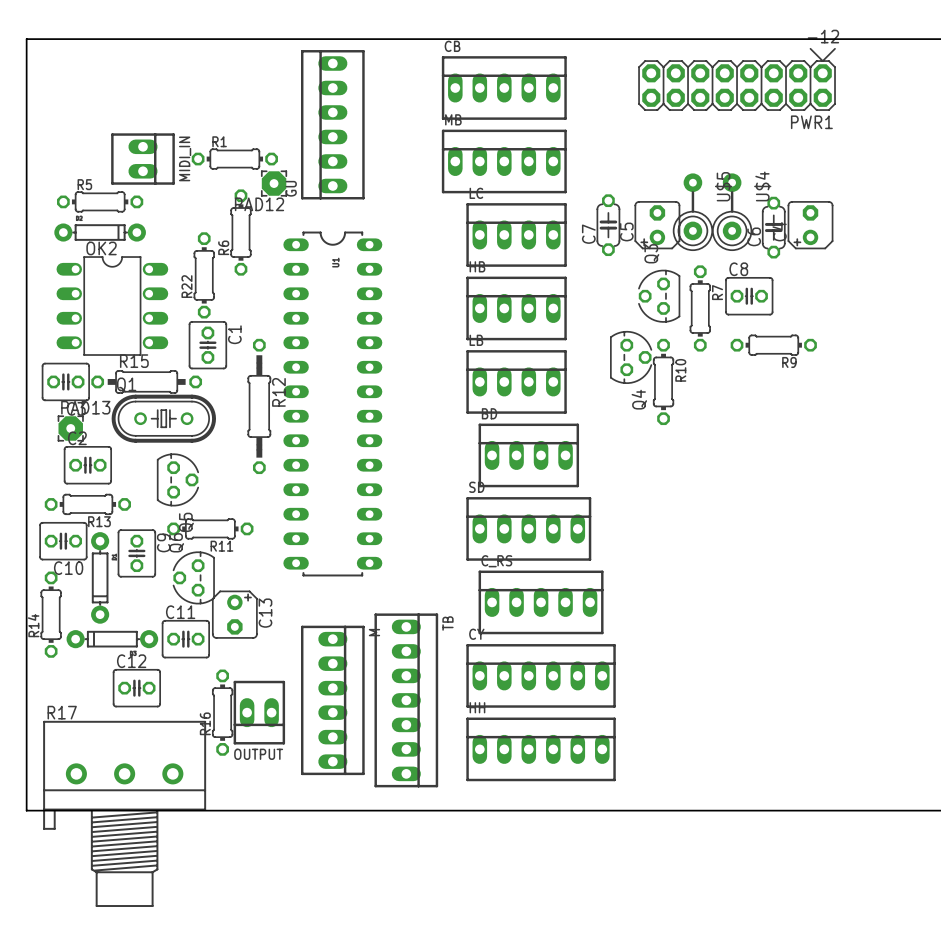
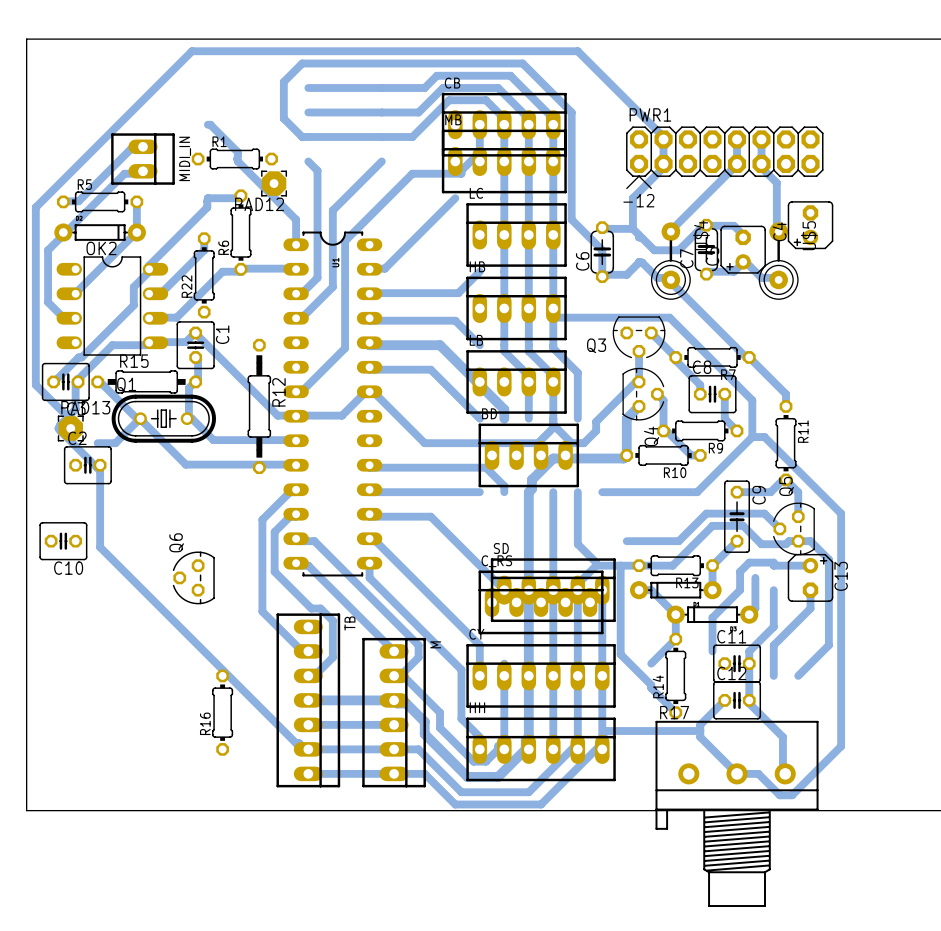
PWR1 footprint: [638, 48, 836, 111] -> [626, 126, 824, 190]
bottom track: none -> (308, 88) (424, 88) (436, 75) (510, 75) (553, 118) (553, 348) (577, 372) (577, 418)
CB position: (504, 88) -> (504, 124)
bottom track: none -> (308, 112) (418, 112) (443, 88) (498, 88) (528, 118) (528, 351) (553, 375) (553, 427) (537, 443) (424, 443) (372, 391) (369, 391) (369, 394) (363, 394) (342, 415) (277, 415) (195, 332) (185, 342) (149, 342) (146, 345) (112, 345) (78, 378) (78, 381) (75, 381) (75, 409) (58, 428) (100, 470) (100, 547) (296, 743) (299, 743) (305, 749) (418, 749) (461, 792) (528, 792) (577, 743) (577, 584) (596, 565)
PWR1 name position: PWR1 (811, 122) -> PWR1 (650, 114)
bottom track: none -> (207, 124) (210, 124) (237, 152) (237, 161) (296, 219) (296, 244)
GU: (332, 124) -> none
bottom track: none -> (479, 124) (479, 152) (461, 170) (461, 173) (412, 173) (345, 241) (345, 348) (302, 391) (296, 391)
bottom track: none -> (737, 139) (737, 164) (670, 231)
bottom track: none -> (761, 139) (761, 167) (776, 182) (776, 228) (778, 231)
bottom track: none -> (143, 146) (143, 149) (130, 149) (78, 201) (63, 201)
bottom track: none -> (308, 161) (317, 170) (317, 277) (302, 293) (296, 293)
bottom track: none -> (381, 161) (332, 210) (332, 287) (302, 317) (296, 318)
bottom track: none -> (143, 171) (143, 173) (124, 173) (66, 231) (63, 232) (63, 234) (48, 250) (48, 302) (63, 317) (75, 318)
bottom track: none -> (240, 195) (240, 198) (207, 198) (207, 207) (149, 265) (149, 271) (133, 287) (133, 305) (81, 357) (78, 357) (53, 381)
bottom track: none -> (455, 198) (384, 268) (369, 269)
bottom track: none -> (136, 201) (136, 232)
U$5 position: (692, 212) -> (778, 261)
U$4 position: (732, 212) -> (670, 261)
C7 position: (608, 225) -> (706, 249)
C5 position: (657, 225) -> (743, 249)
bottom track: none -> (602, 227) (632, 228)
C6 position: (773, 227) -> (602, 252)
bottom track: none -> (632, 228) (639, 237) (642, 238) (654, 250) (678, 250) (703, 225) (706, 225) (733, 225) (743, 234) (743, 237)
bottom track: none -> (632, 228) (632, 198) (663, 167) (663, 139) (660, 133) (577, 51) (191, 51) (35, 207) (35, 385) (67, 417)
bottom track: none -> (136, 231) (75, 293)
bottom track: none -> (204, 238) (204, 250) (161, 293) (149, 293)
bottom track: none -> (296, 269) (244, 268) (240, 269) (240, 271) (222, 271) (176, 317) (149, 318)
bottom track: none -> (479, 271) (458, 293) (369, 293)
bottom track: none -> (602, 274) (626, 274) (639, 261) (642, 262) (657, 277) (669, 277) (669, 280) (746, 357) (749, 357) (786, 394) (786, 406)
bottom track: none -> (706, 274) (706, 271) (733, 271) (743, 261) (746, 262) (761, 277) (776, 277) (778, 279)
bottom track: none -> (602, 276) (602, 250) (571, 219) (571, 112) (522, 63) (302, 63) (283, 81) (283, 118) (302, 136) (412, 136) (449, 100) (485, 100) (504, 118) (504, 351) (528, 375) (528, 418)
Q3 rotation: 0° (659, 296) -> 90° counterclockwise (639, 337)
Q3 position: (659, 296) -> (639, 337)
C8 position: (749, 296) -> (712, 394)
R7 rotation: 0° (700, 308) -> 90° clockwise (712, 357)
bottom track: none -> (553, 317) (669, 317) (752, 400) (752, 437)
bottom track: none -> (369, 318) (369, 320) (455, 320) (479, 345)
bottom track: none -> (651, 332) (700, 385) (700, 394)
bottom track: none -> (369, 342) (369, 345) (440, 345) (504, 409) (504, 418)
C1 position: (207, 345) -> (195, 345)
R9 position: (773, 345) -> (700, 430)
bottom track: none -> (639, 351) (639, 381) (635, 381) (596, 421) (596, 430) (583, 443) (571, 443) (553, 424)
bottom track: none -> (195, 357) (198, 357) (198, 378) (188, 388) (188, 418)
Q4 position: (631, 357) -> (643, 394)
bottom track: none -> (369, 367) (369, 369) (430, 369) (479, 418)
bottom track: none -> (97, 381) (100, 381) (136, 418) (140, 418) (185, 464) (296, 465)
R10 rotation: 0° (663, 381) -> 90° clockwise (663, 455)
R10 position: (663, 381) -> (663, 455)
bottom track: none -> (657, 394) (663, 400) (663, 430) (666, 430) (691, 455) (700, 455)
bottom track: none -> (724, 394) (724, 418) (737, 430)
bottom track: none -> (639, 406) (626, 418) (626, 455) (623, 458) (553, 458) (531, 479) (531, 489) (528, 492) (528, 737) (525, 740) (525, 749) (498, 776) (467, 776) (424, 734) (424, 721) (406, 703) (397, 703) (394, 700) (308, 700)
bottom track: none -> (139, 418) (115, 443) (97, 443)
bottom track: none -> (187, 418) (191, 418) (213, 440) (296, 440)
bottom track: none -> (752, 437) (697, 492) (602, 492)
bottom track: none -> (752, 437) (764, 437) (841, 513) (841, 746) (792, 795) (779, 795) (758, 773) (737, 773) (700, 737) (700, 724) (724, 700)
bottom track: none -> (369, 465) (369, 467) (485, 467) (504, 486) (504, 492)
Q5 rotation: 0° (177, 479) -> 180° (793, 528)
Q5 position: (177, 479) -> (793, 528)
bottom track: none -> (296, 489) (296, 492) (289, 492) (262, 519) (262, 611) (302, 651) (308, 651)
bottom track: none -> (369, 489) (369, 492) (479, 492)
bottom track: none -> (553, 492) (553, 737)
bottom track: none -> (577, 492) (577, 544) (596, 562) (596, 565)
bottom track: none -> (737, 492) (770, 492) (782, 479) (786, 479) (798, 492) (798, 516)
R13 position: (87, 504) -> (675, 565)
bottom track: none -> (296, 514) (296, 516) (289, 516) (274, 531) (274, 571) (311, 608) (320, 608) (332, 620) (332, 657) (314, 675) (308, 675)
bottom track: none -> (369, 514) (369, 516) (430, 516) (504, 590)
R11 rotation: 0° (210, 528) -> 90° clockwise (786, 443)
R11 position: (210, 528) -> (786, 443)
SD position: (528, 528) -> (553, 590)
bottom track: none -> (779, 528) (764, 513) (706, 513) (678, 541) (626, 541)
C9 footprint: [117, 529, 156, 578] -> [724, 480, 751, 553]
bottom track: none -> (296, 538) (296, 541) (314, 541) (418, 645) (418, 657) (400, 675)
bottom track: none -> (369, 538) (369, 541) (375, 541) (479, 645) (479, 663)
bottom track: none -> (737, 541) (712, 565) (712, 590)
R11 name position: R11 (221, 546) -> R11 (803, 431)
bottom track: none -> (296, 563) (296, 565) (308, 565) (394, 651)
bottom track: none -> (369, 563) (369, 577) (461, 669) (461, 718) (479, 737)
bottom track: none -> (596, 565) (672, 565) (712, 525) (743, 525) (761, 544) (786, 544) (789, 541) (810, 541) (828, 559) (828, 645) (798, 675)
bottom track: none -> (620, 565) (620, 654) (675, 712)
bottom track: none -> (810, 565) (773, 565) (773, 562) (749, 562) (740, 571) (740, 590) (712, 617) (712, 651)
part rotation: 0° (100, 577) -> 90° clockwise (675, 590)
part position: (100, 577) -> (675, 590)
bottom track: none -> (755, 577) (755, 608) (749, 614)
bottom track: none -> (602, 590) (602, 743) (541, 804) (455, 804) (424, 773) (308, 773)
bottom track: none -> (639, 590) (651, 590) (675, 614) (675, 639) (651, 663)
bottom track: none -> (773, 590) (773, 626) (749, 651) (749, 703) (782, 737) (782, 773) (785, 773)
bottom track: none -> (810, 590) (810, 608) (773, 645) (773, 675)
R14 position: (51, 614) -> (675, 675)
C13 position: (234, 614) -> (810, 577)
part position: (112, 639) -> (712, 614)
C11 position: (185, 639) -> (737, 663)
bottom track: none -> (504, 663) (504, 740) (485, 761) (473, 761) (440, 727) (440, 712) (403, 675) (394, 675)
C12 position: (136, 688) -> (737, 700)
M position: (332, 700) -> (394, 712)
TB position: (406, 700) -> (308, 700)
OUTPUT: (259, 712) -> none
bottom track: none -> (308, 724) (394, 724)
bottom track: none -> (700, 731) (605, 731) (602, 737)
R17 position: (124, 813) -> (737, 813)

